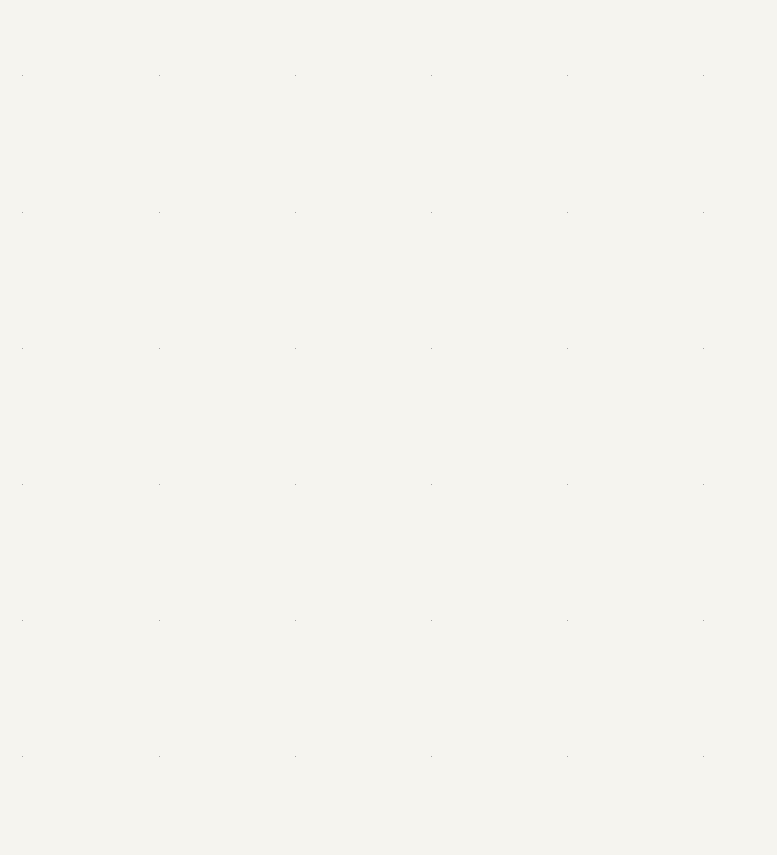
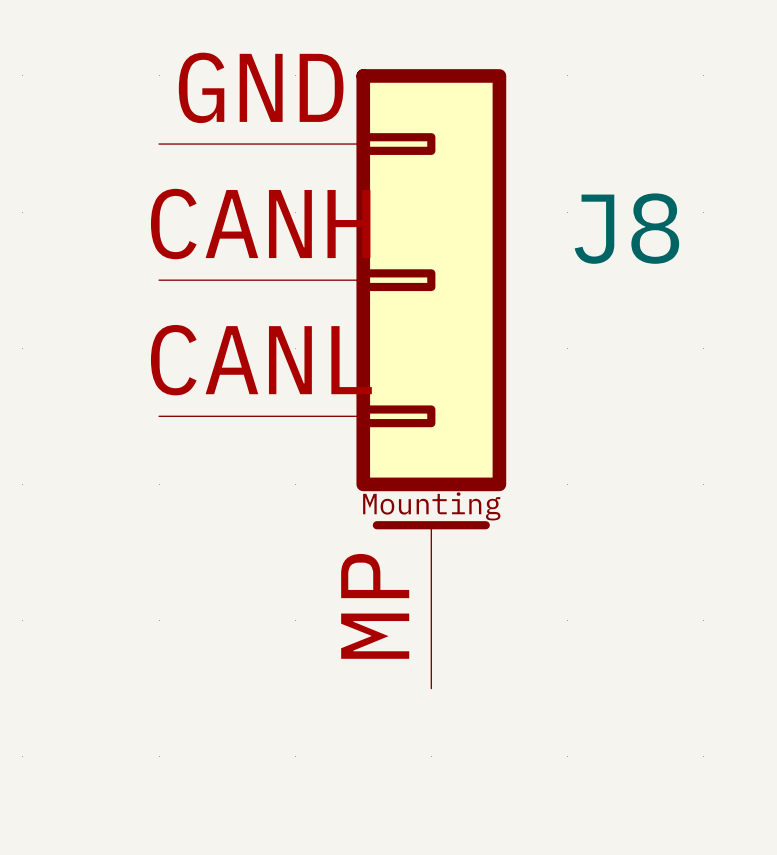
J8: none -> (332, 378)

